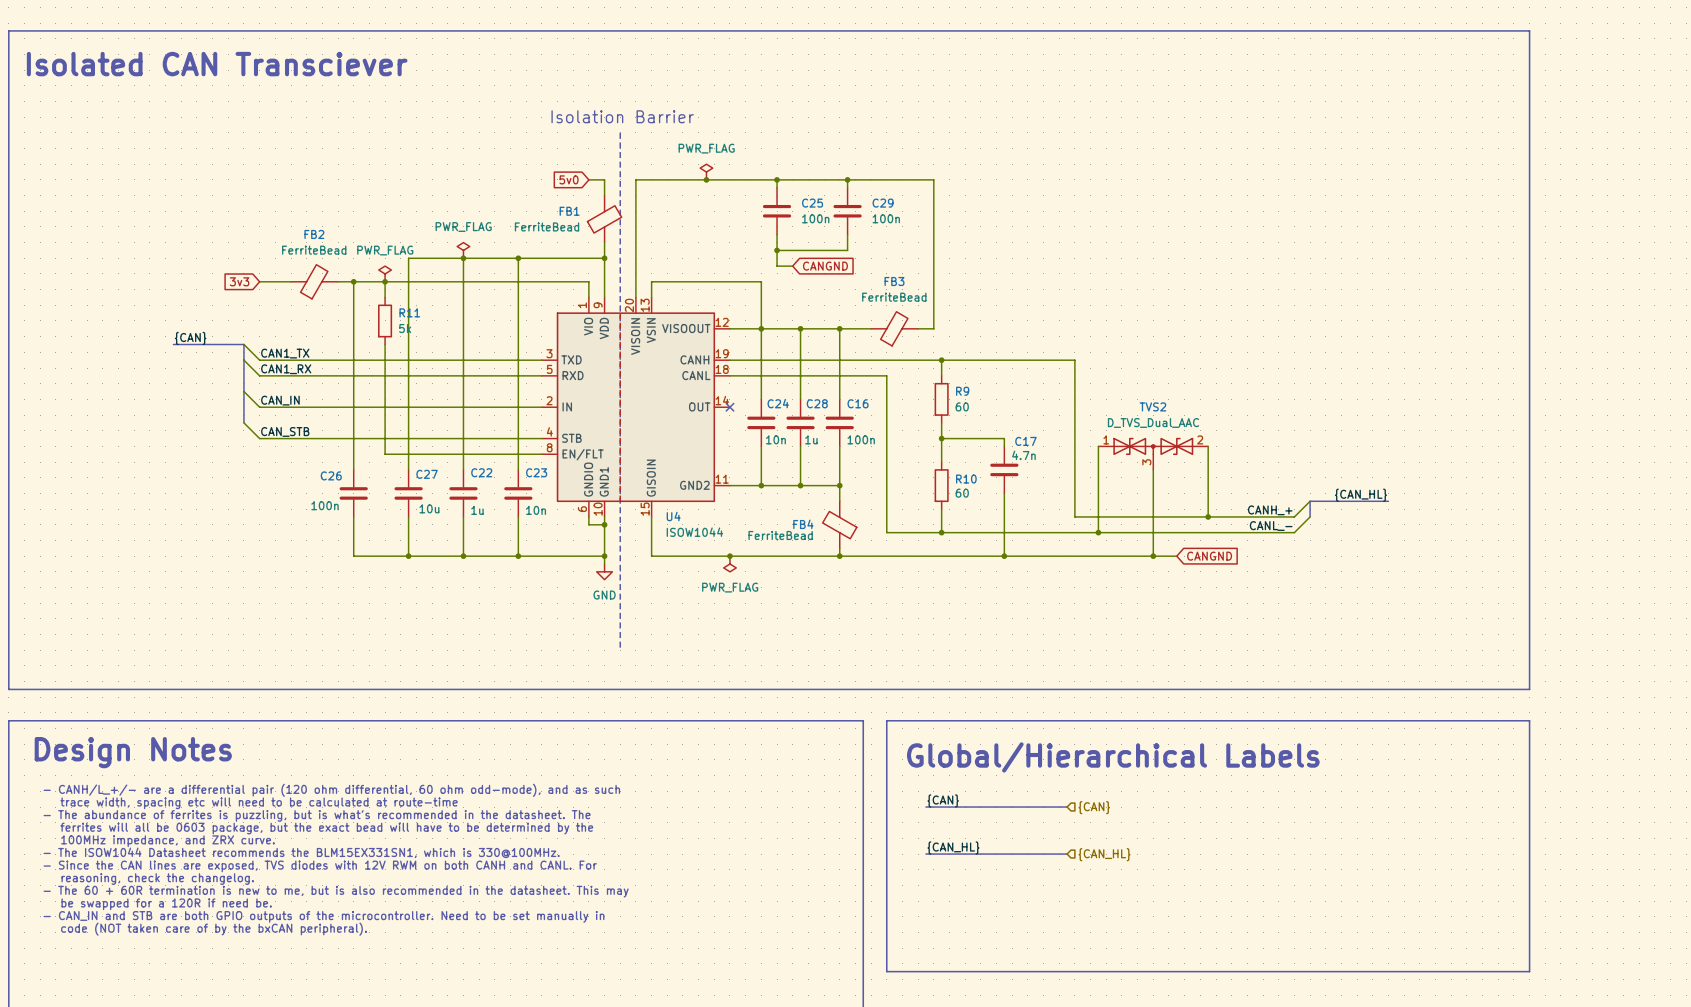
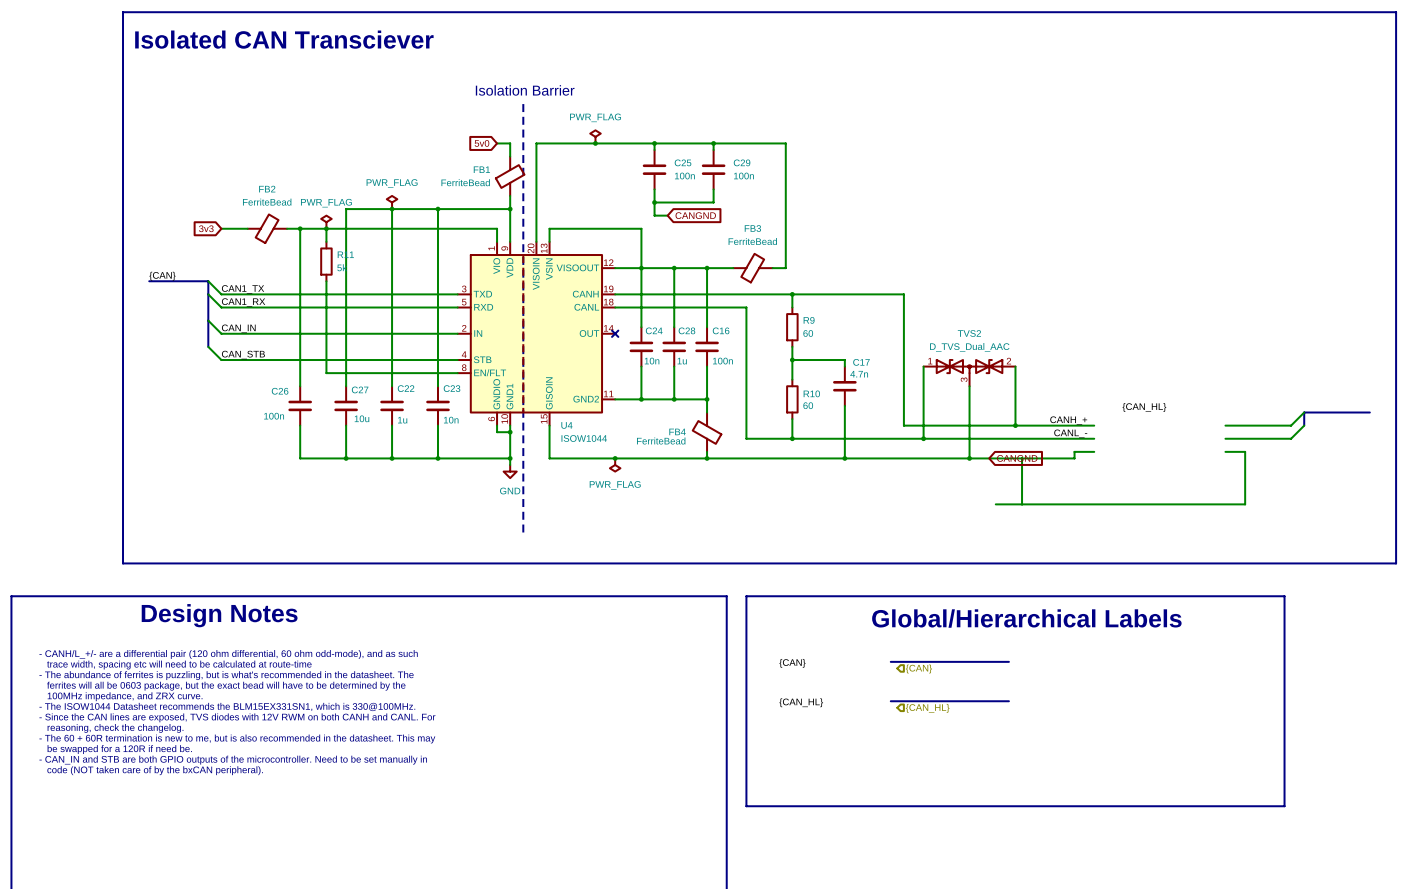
line: (8, 30) (1529, 30) (1529, 689) (8, 689) (8, 30) -> (123, 12) (1396, 12) (1396, 563) (123, 563) (123, 12)
text position: Isolated CAN Transciever (217, 64) -> Isolated CAN Transciever (284, 39)
wire: (1310, 501) (1294, 516) -> (1094, 425) (1087, 425)
bus: (1388, 501) (1310, 501) (1310, 516) -> none
wire: none -> (1304, 412) (1291, 425) (1225, 425)
bus: none -> (1369, 412) (1304, 412) (1304, 425)
wire: (1310, 516) (1294, 532) -> (1094, 438) (1087, 438)
wire: none -> (1304, 425) (1291, 438) (1225, 438)
wire: none -> (1094, 451) (1074, 451) (1074, 458) (989, 458)
wire: none -> (1225, 451) (1245, 451) (1245, 504) (995, 504)
wire: none -> (1022, 458) (1022, 504)
text position: Design Notes (133, 752) -> Design Notes (219, 615)
text position: Global/Hierarchical Labels (1113, 757) -> Global/Hierarchical Labels (1026, 618)
bus: (925, 807) (1067, 807) -> (890, 661) (1008, 661)
bus: (925, 854) (1067, 854) -> (890, 701) (1008, 701)

